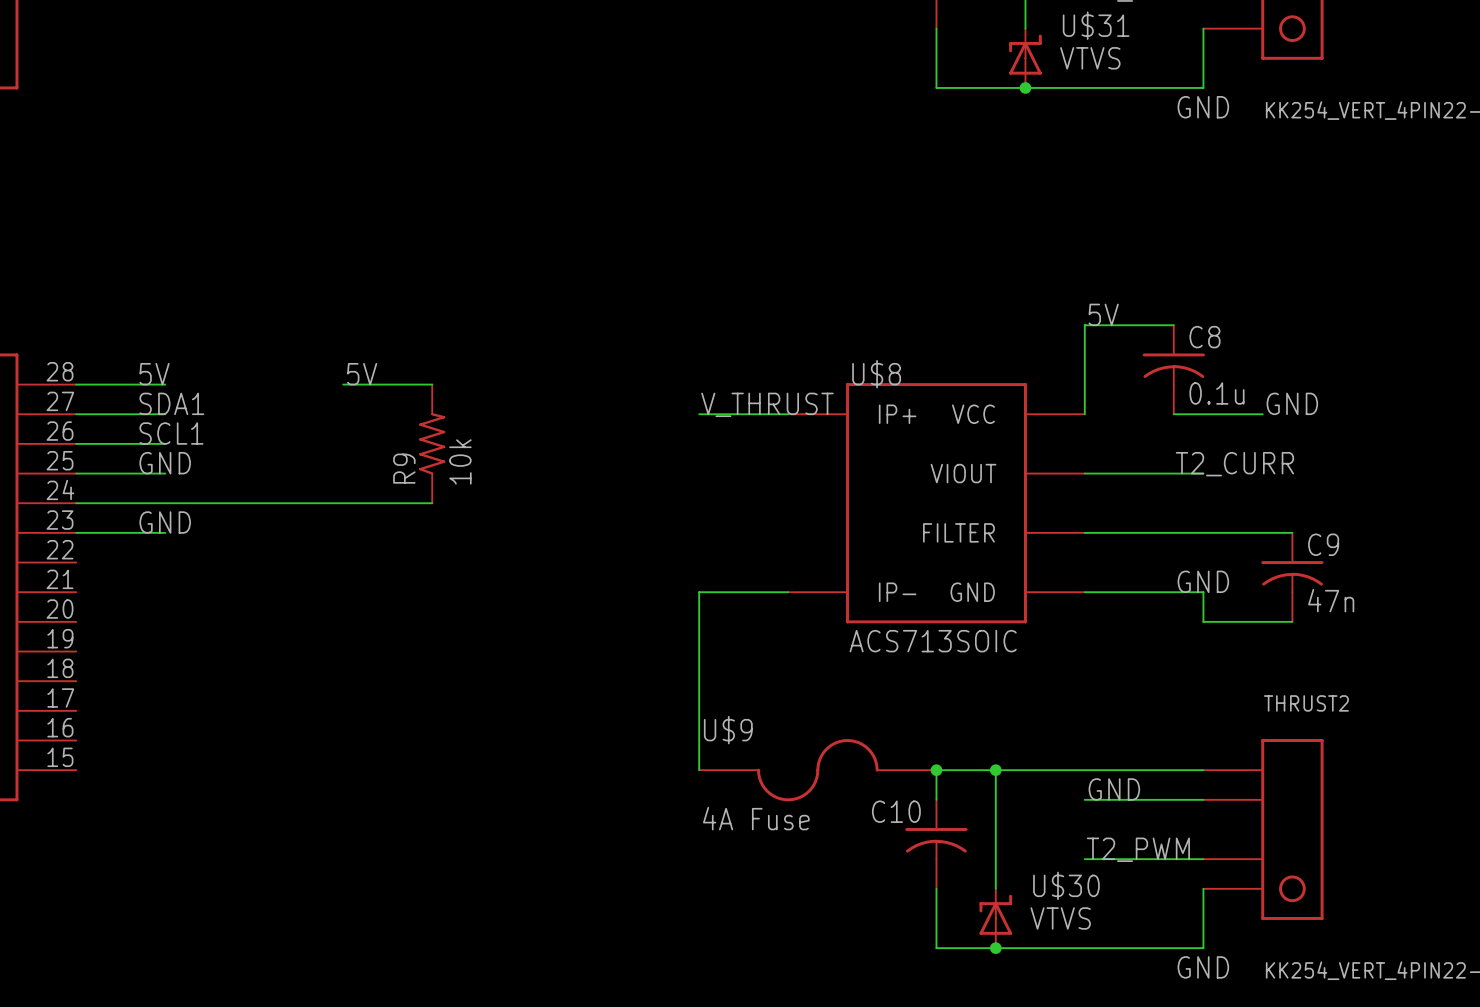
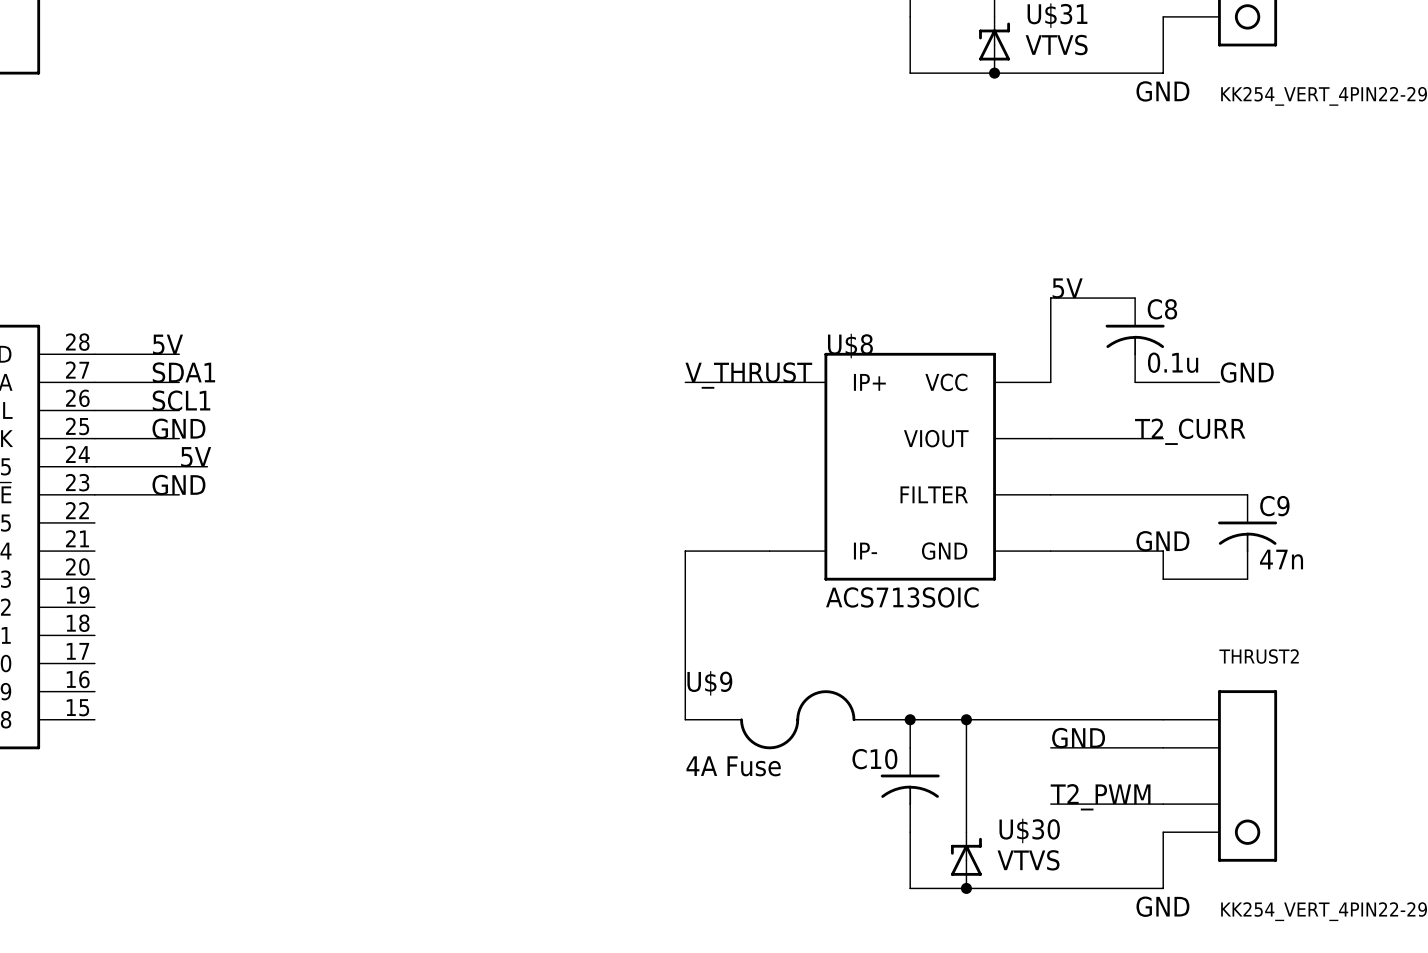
label position: 5V (362, 374) -> 5V (196, 457)
wire: (343, 384) (432, 384) -> none
R9: 10k (432, 443) -> none
wire: (194, 503) (432, 503) -> none

